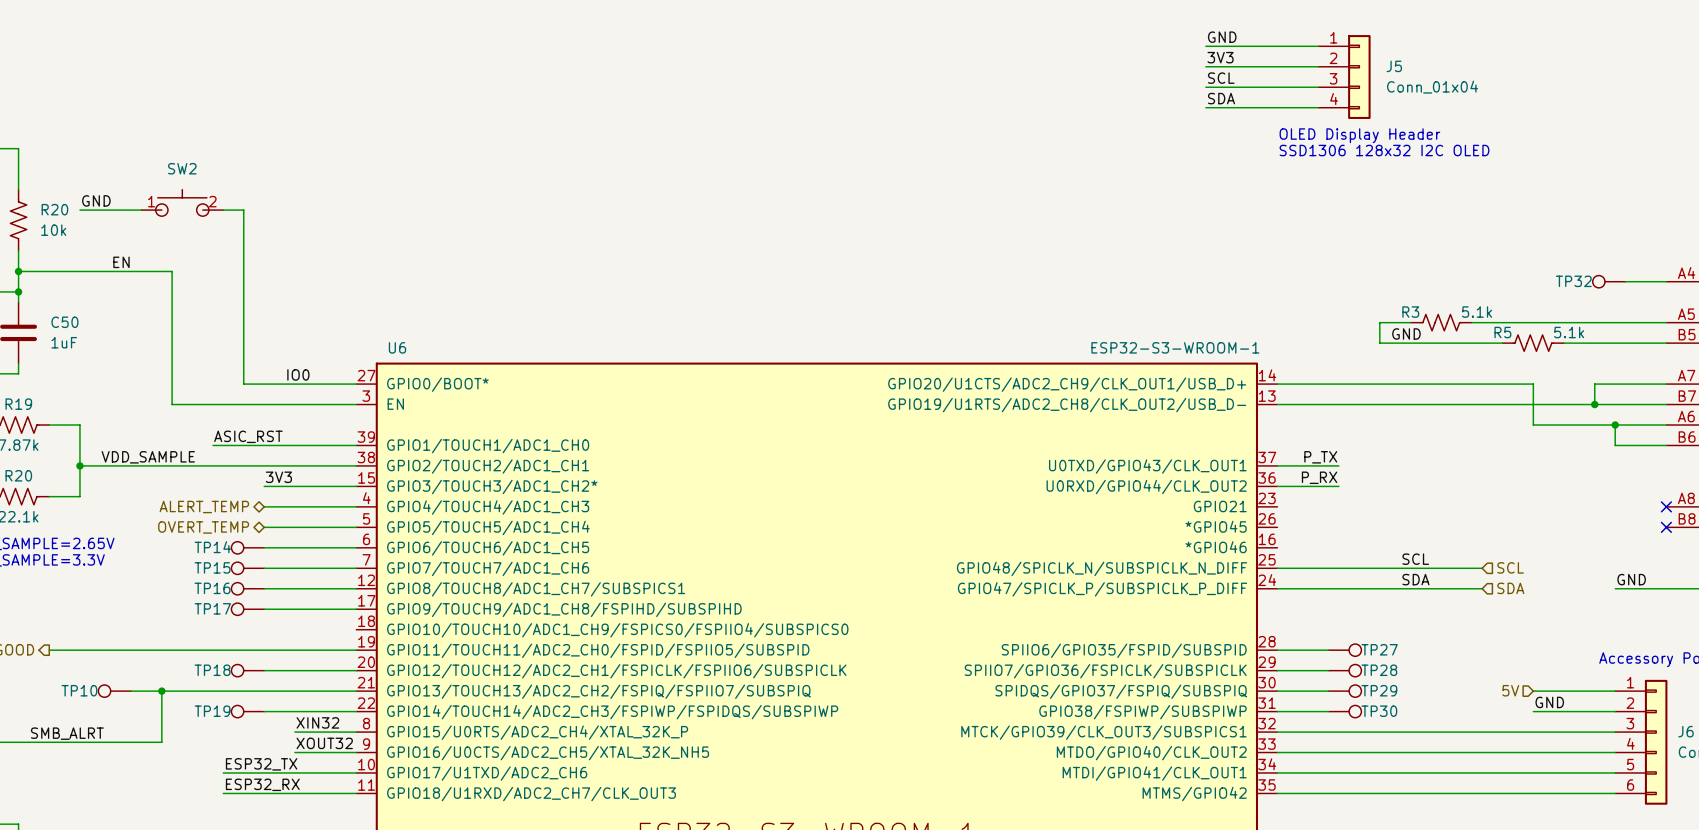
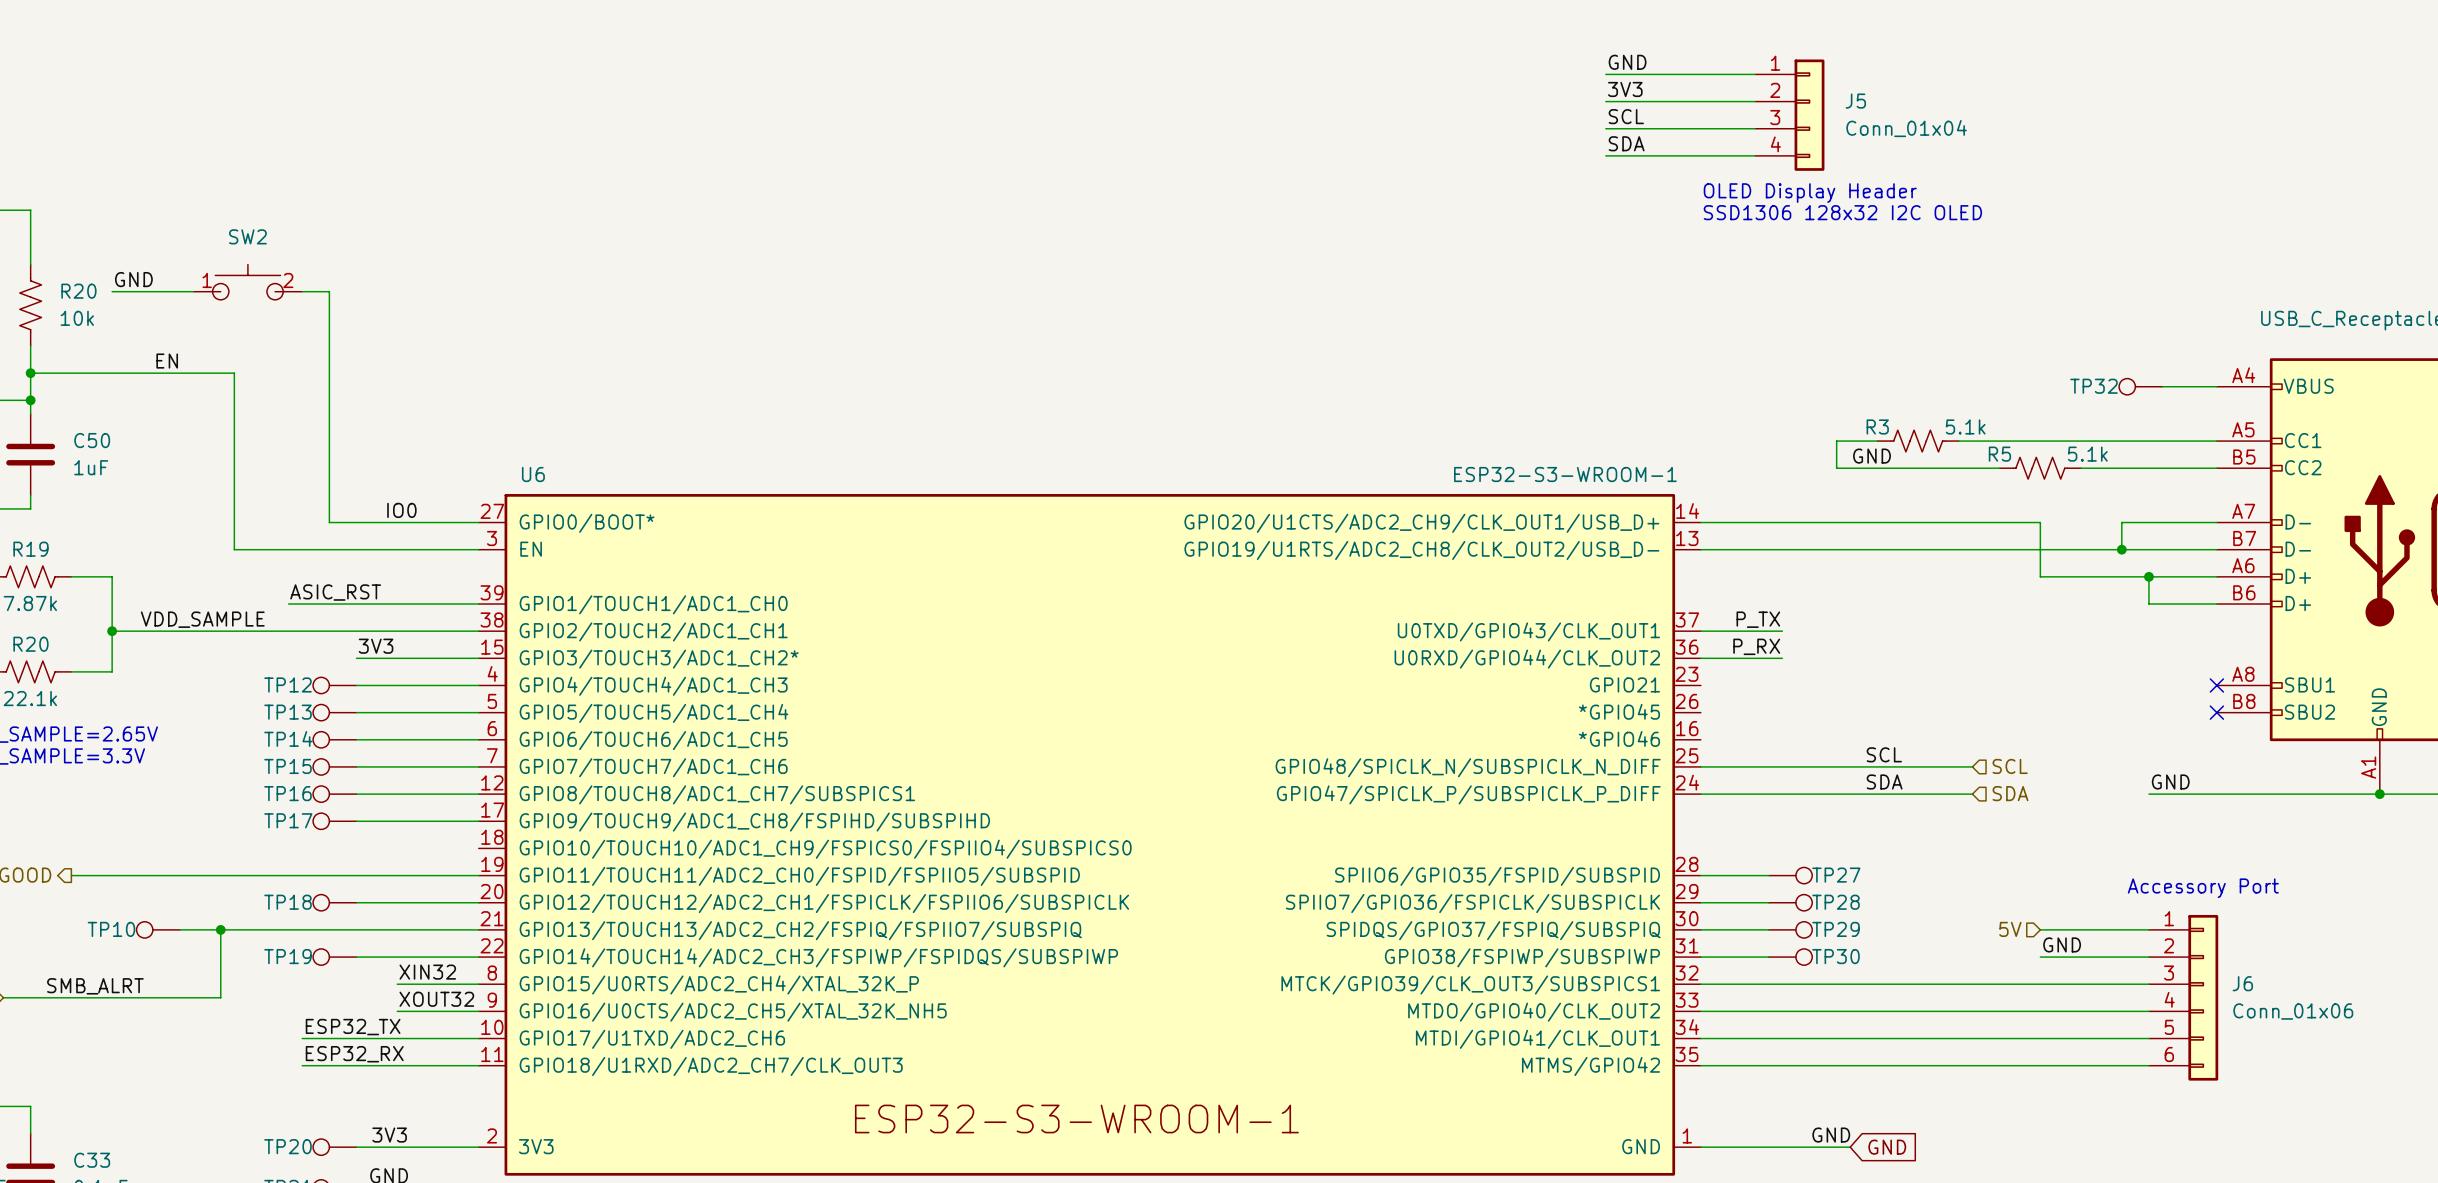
hierarchical label: ALERT_TEMP (204, 506) -> none
TP12: none -> (334, 685)
hierarchical label: OVERT_TEMP (203, 527) -> none
TP13: none -> (334, 712)

